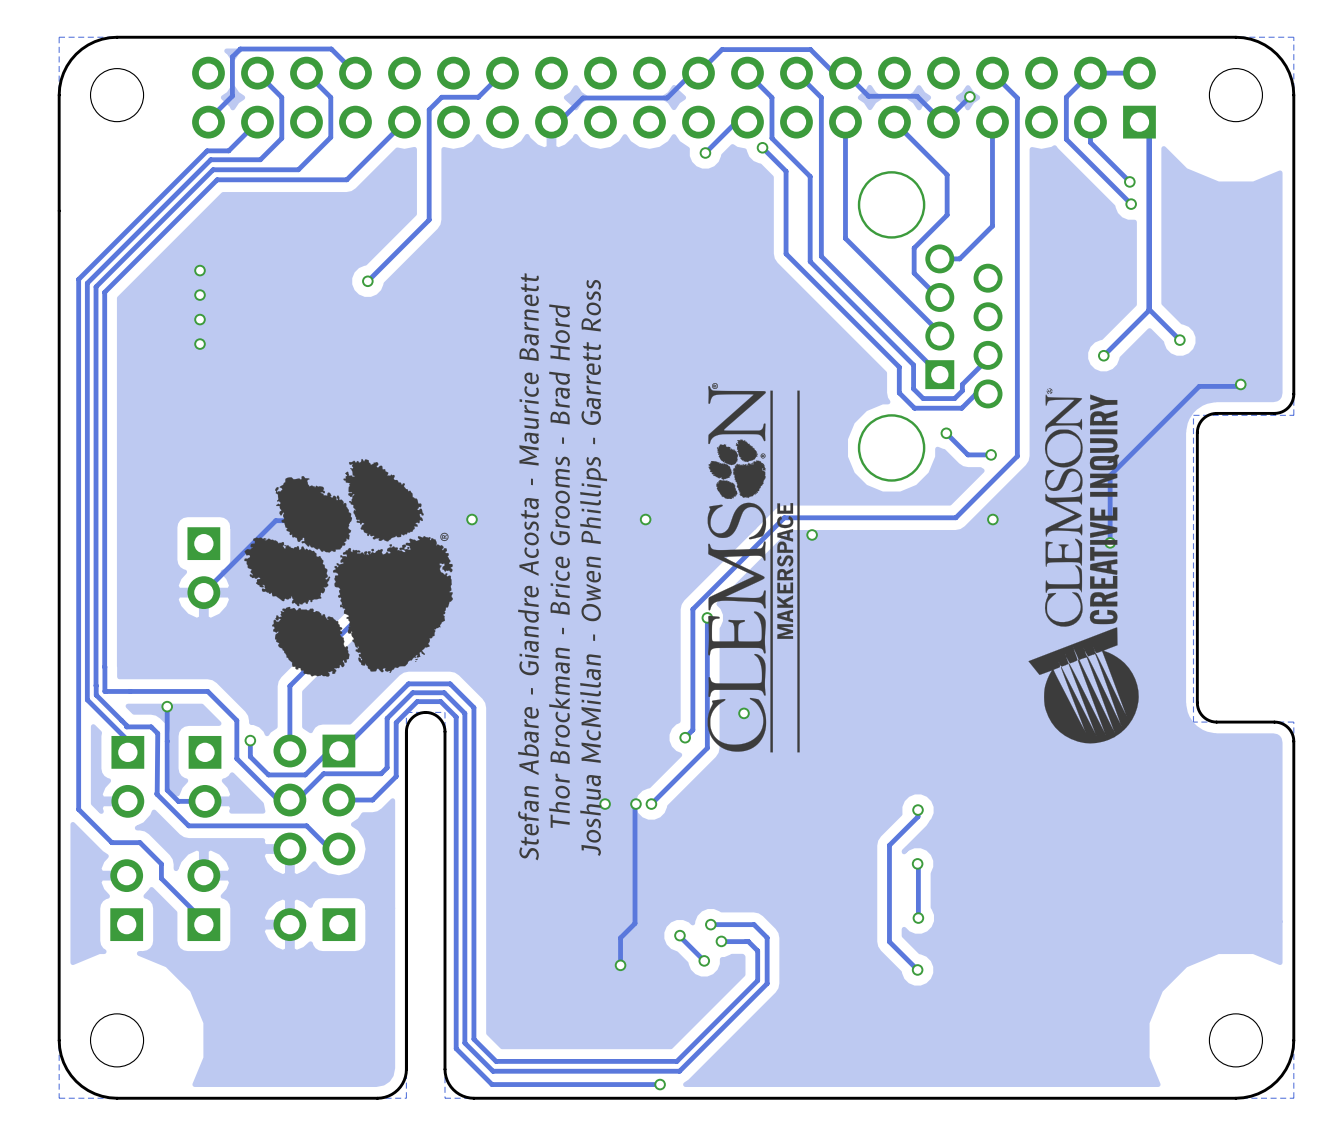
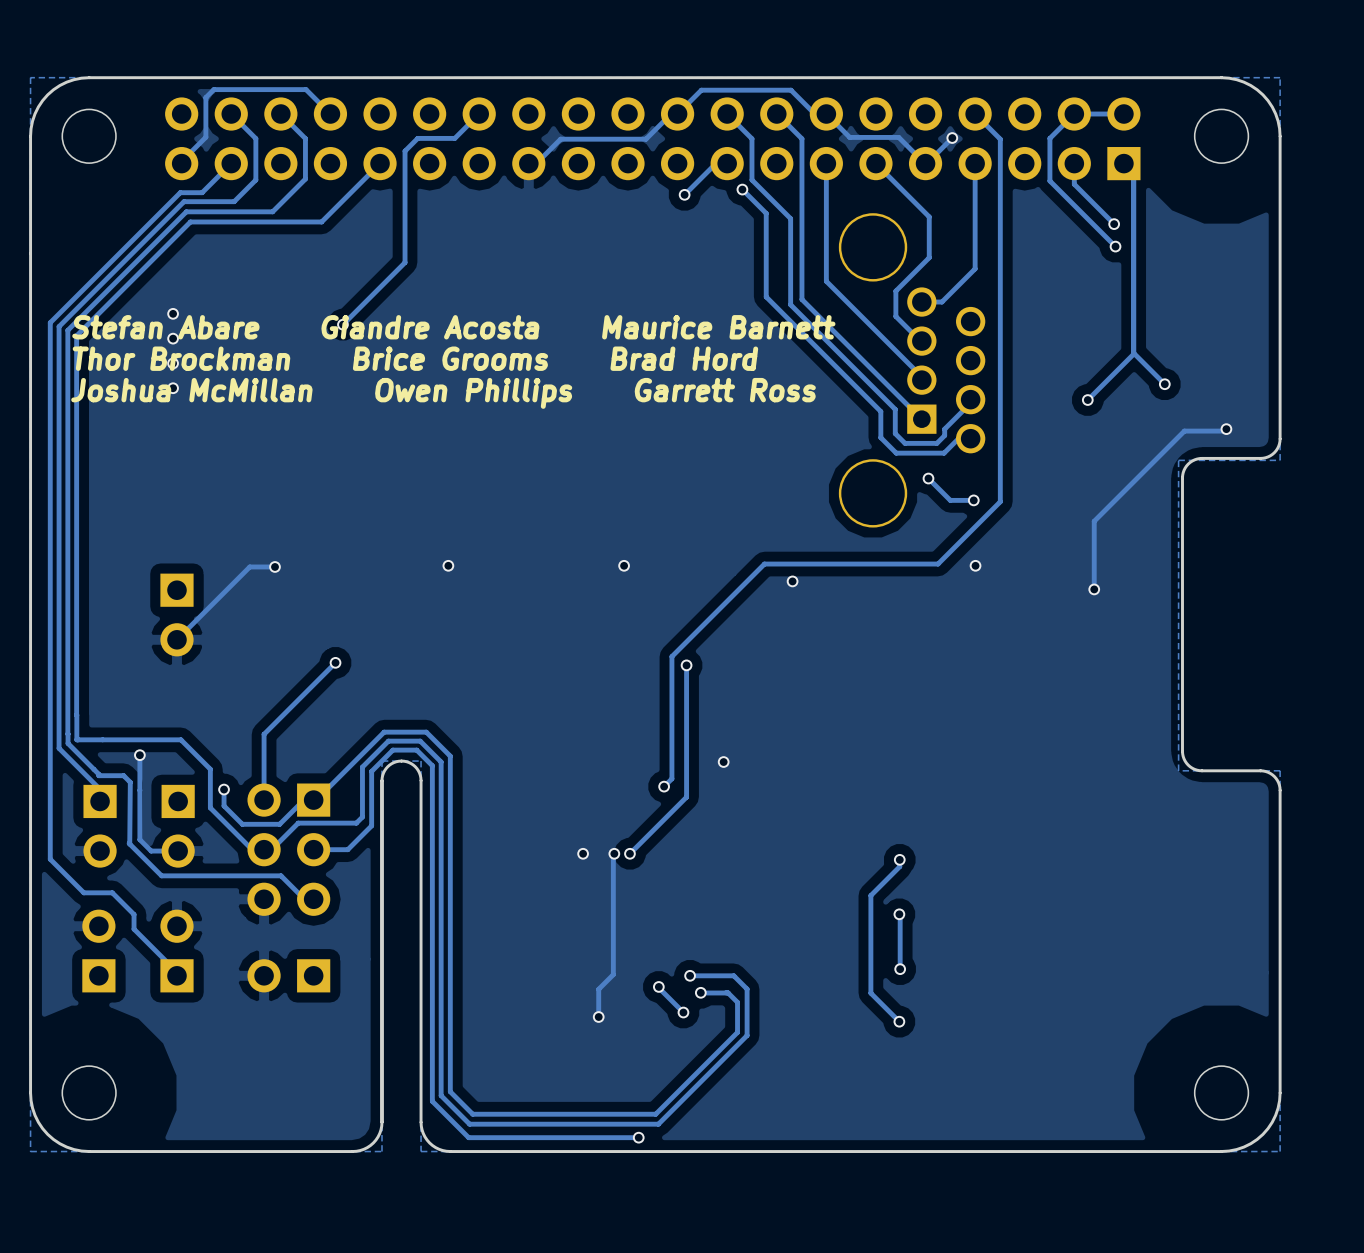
text: none -> Stefan Abare Giandre Acosta Maurice Barnett (453, 327)
text: none -> Thor Brockman Brice Grooms Brad Hord (415, 358)
text: none -> Joshua McMillan Owen Phillips Garrett Ross (443, 393)
drawing: [707, 383, 800, 753] -> none
drawing: [1028, 388, 1139, 744] -> none
drawing: [244, 458, 453, 677] -> none
text: Stefan Abare - Giandre Acosta - Maurice Barnett (528, 566) -> none
text: Thor Brockman - Brice Grooms - Brad Hord (559, 566) -> none
text: Joshua McMillan - Owen Phillips - Garrett Ross (593, 567) -> none

